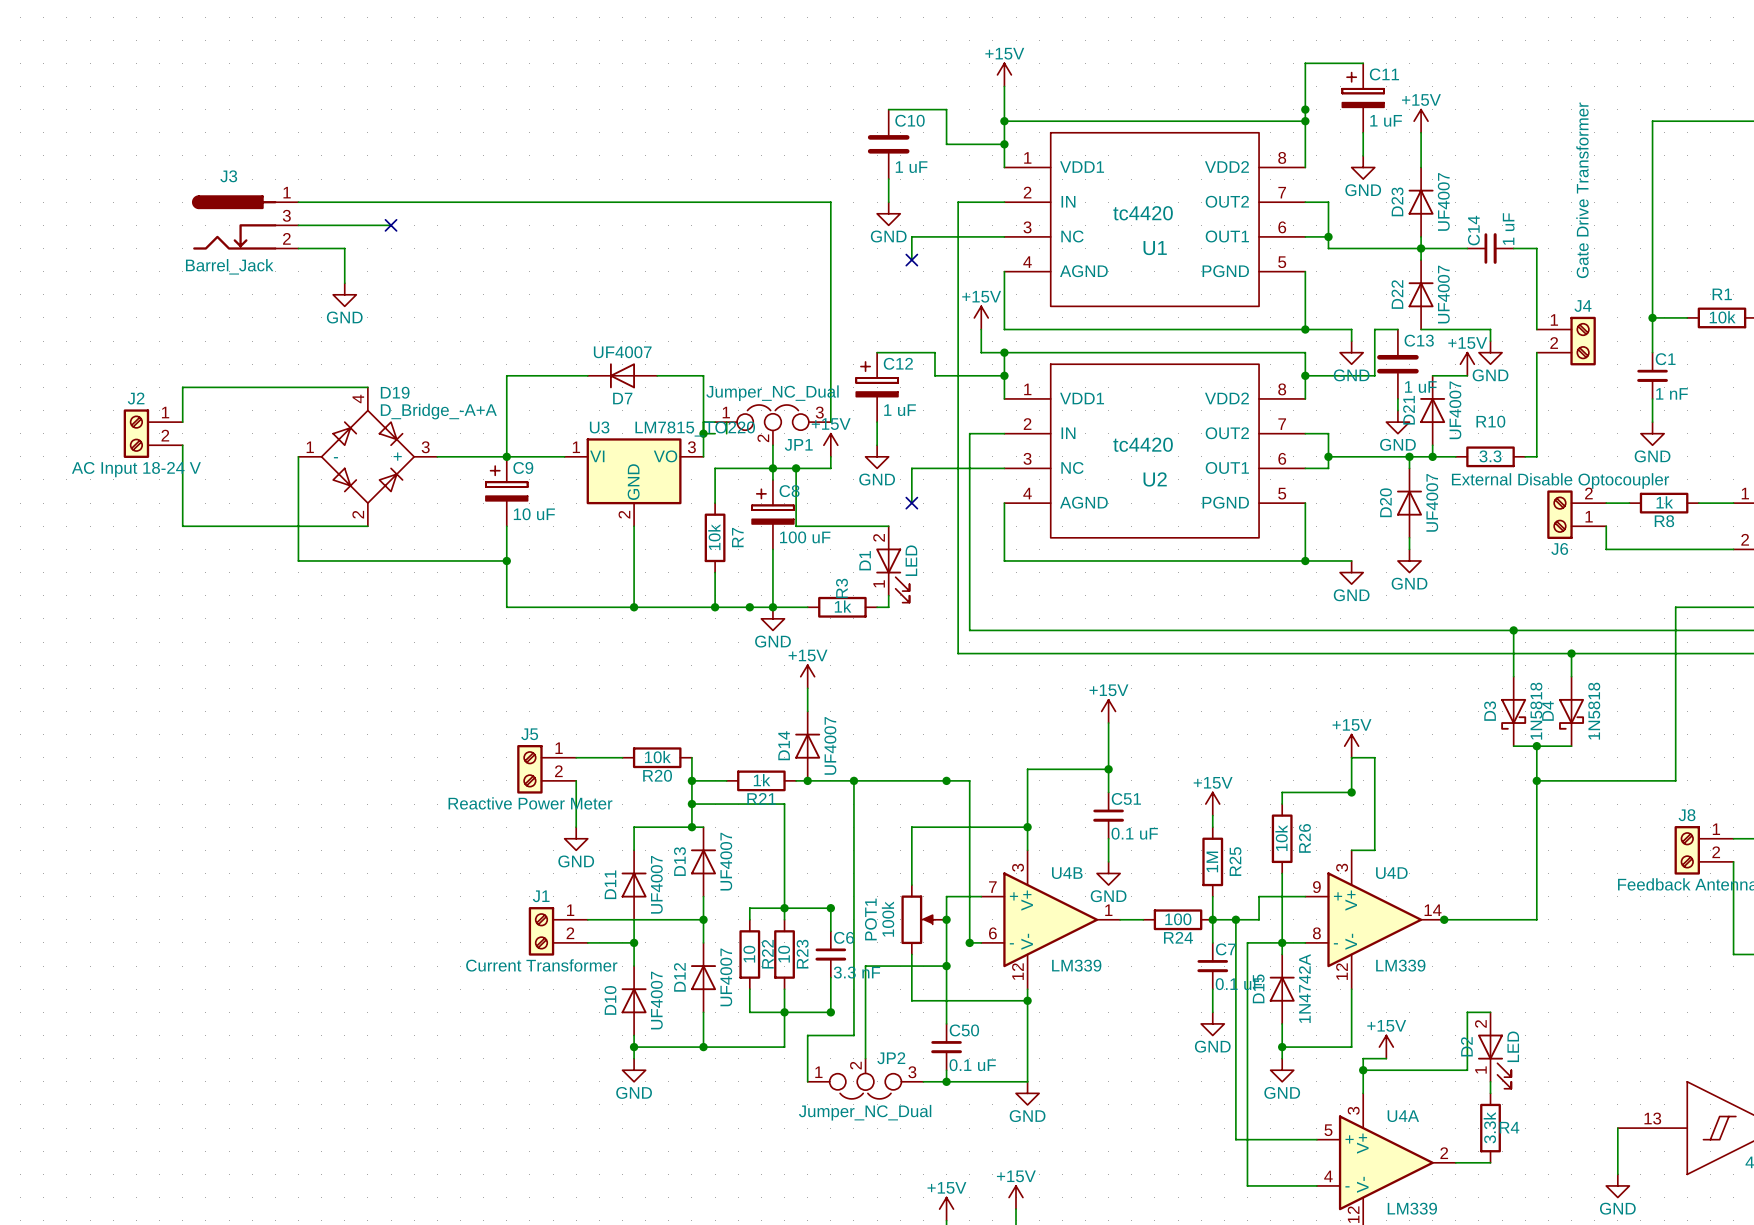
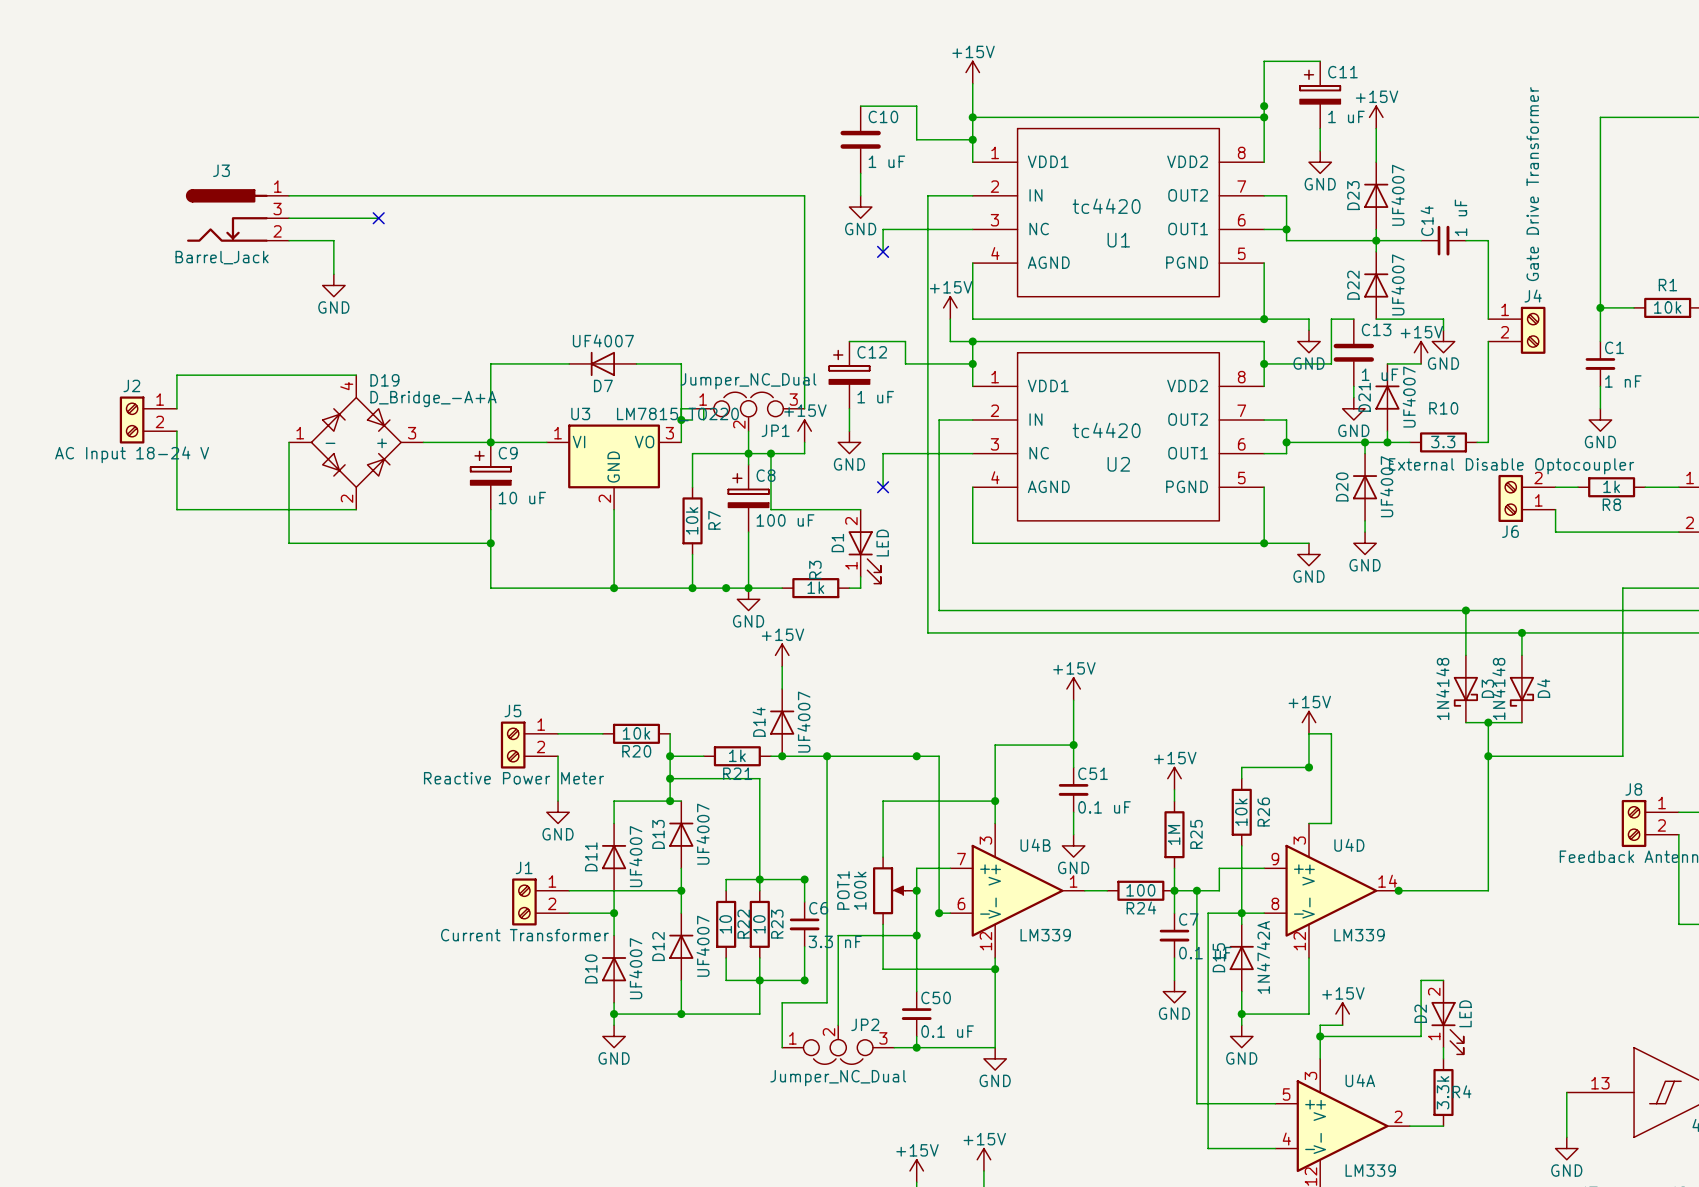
D3 name position: D3 (1490, 711) -> D3 (1487, 688)
D3 value: 1N5818 (1536, 711) -> 1N4148 (1442, 689)
D4 name position: D4 (1547, 711) -> D4 (1543, 688)
D4 value: 1N5818 (1594, 711) -> 1N4148 (1498, 689)

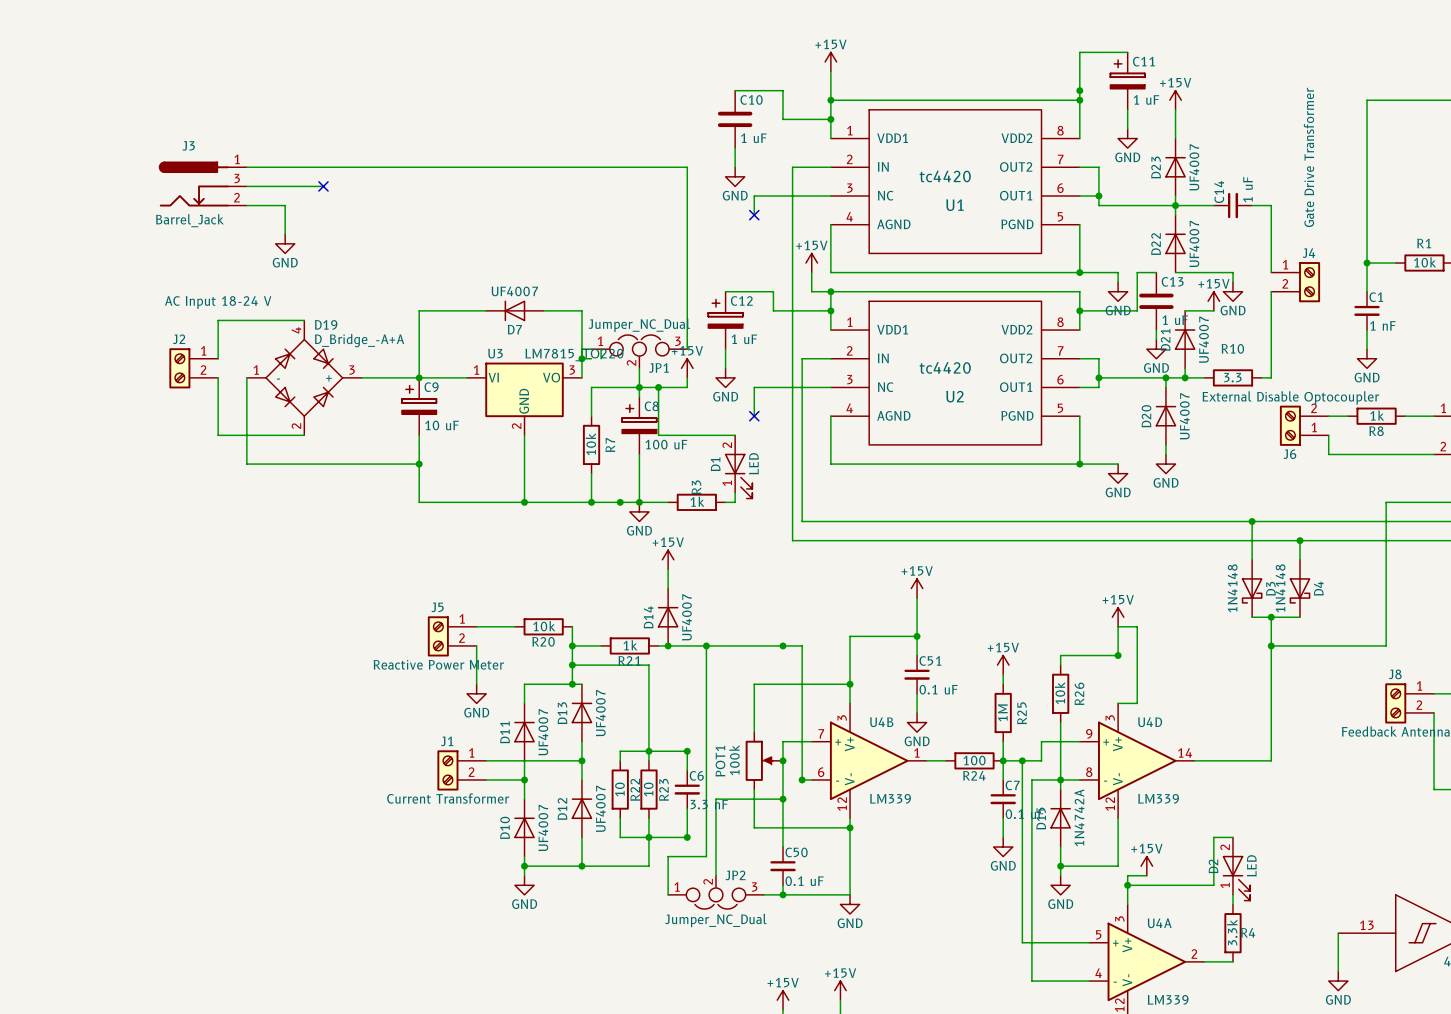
wire: (255, 375) (176, 375) (176, 408) -> (218, 320) (218, 358)
J2 position: (148, 419) -> (193, 368)
wire: (176, 431) (176, 509) (255, 509) -> (218, 377) (218, 435)
J2 value position: AC Input 18-24 V (132, 454) -> AC Input 18-24 V (218, 302)
junction: (1398, 890) -> none

